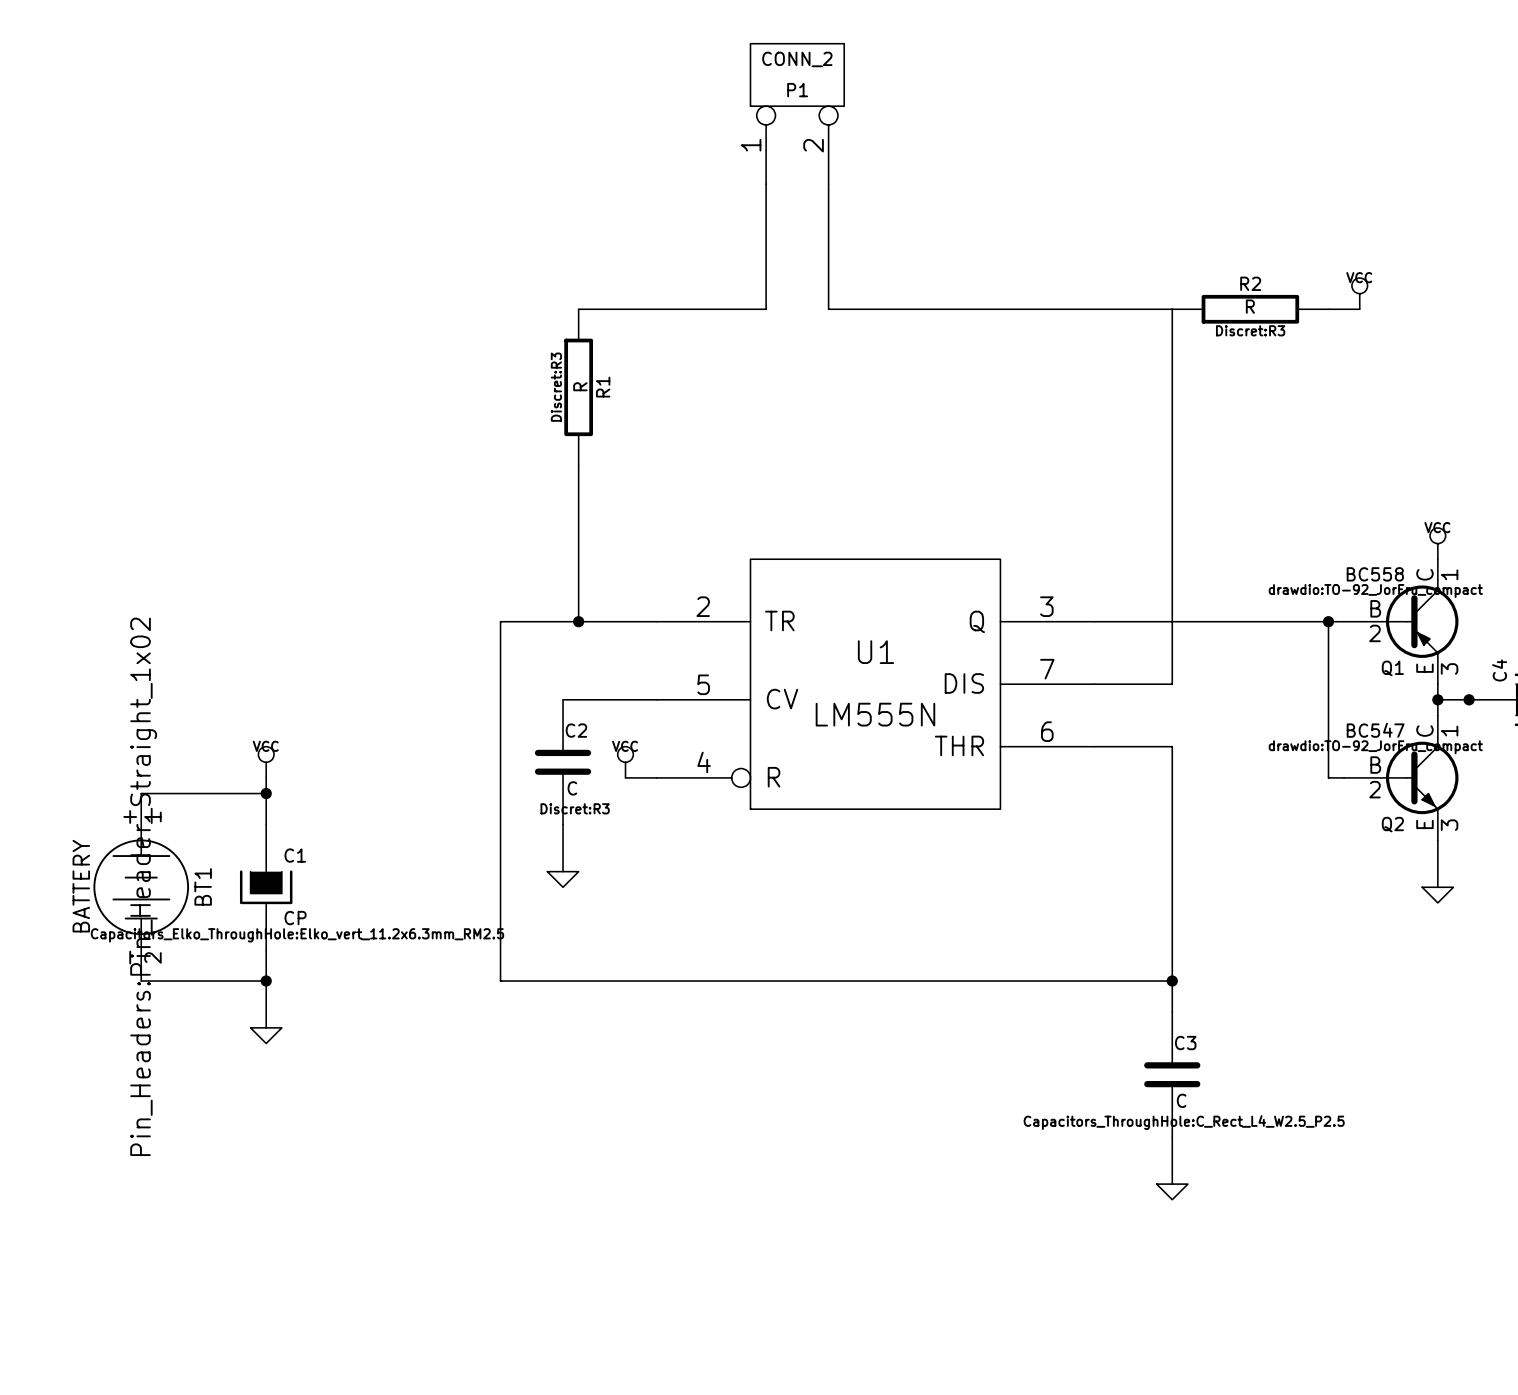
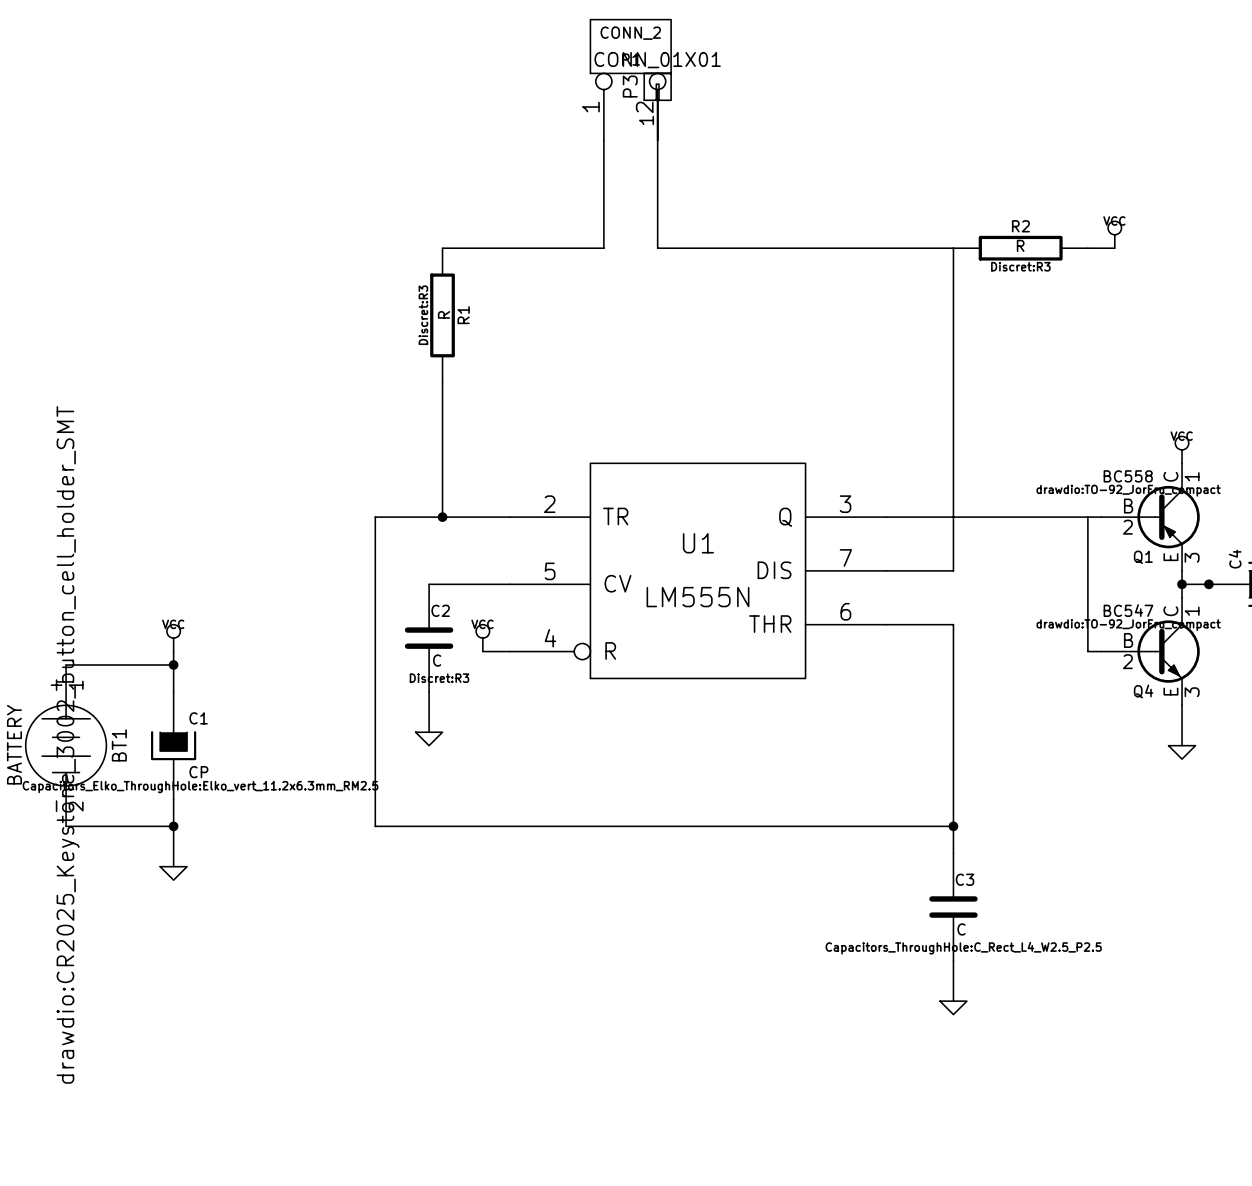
P3: none -> CONN_01X01 (657, 107)
junction: (1328, 621) -> none
Q2 name: Q2 (1392, 824) -> Q4 (1143, 691)
BT1 text: Pin_Headers:Pin_Header_Straight_1x02 (143, 886) -> drawdio:CR2025_Keystone_3002_button_cell_holder_SMT (68, 744)

